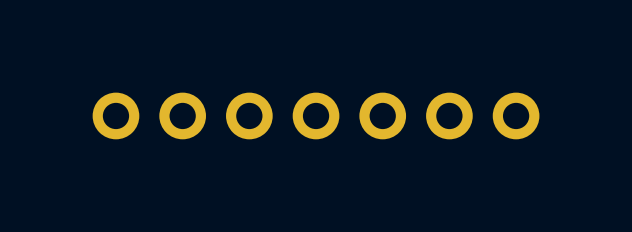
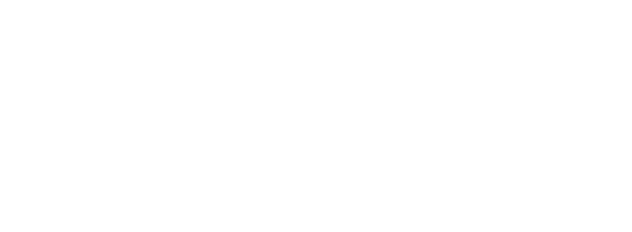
part: (316, 115) -> none

